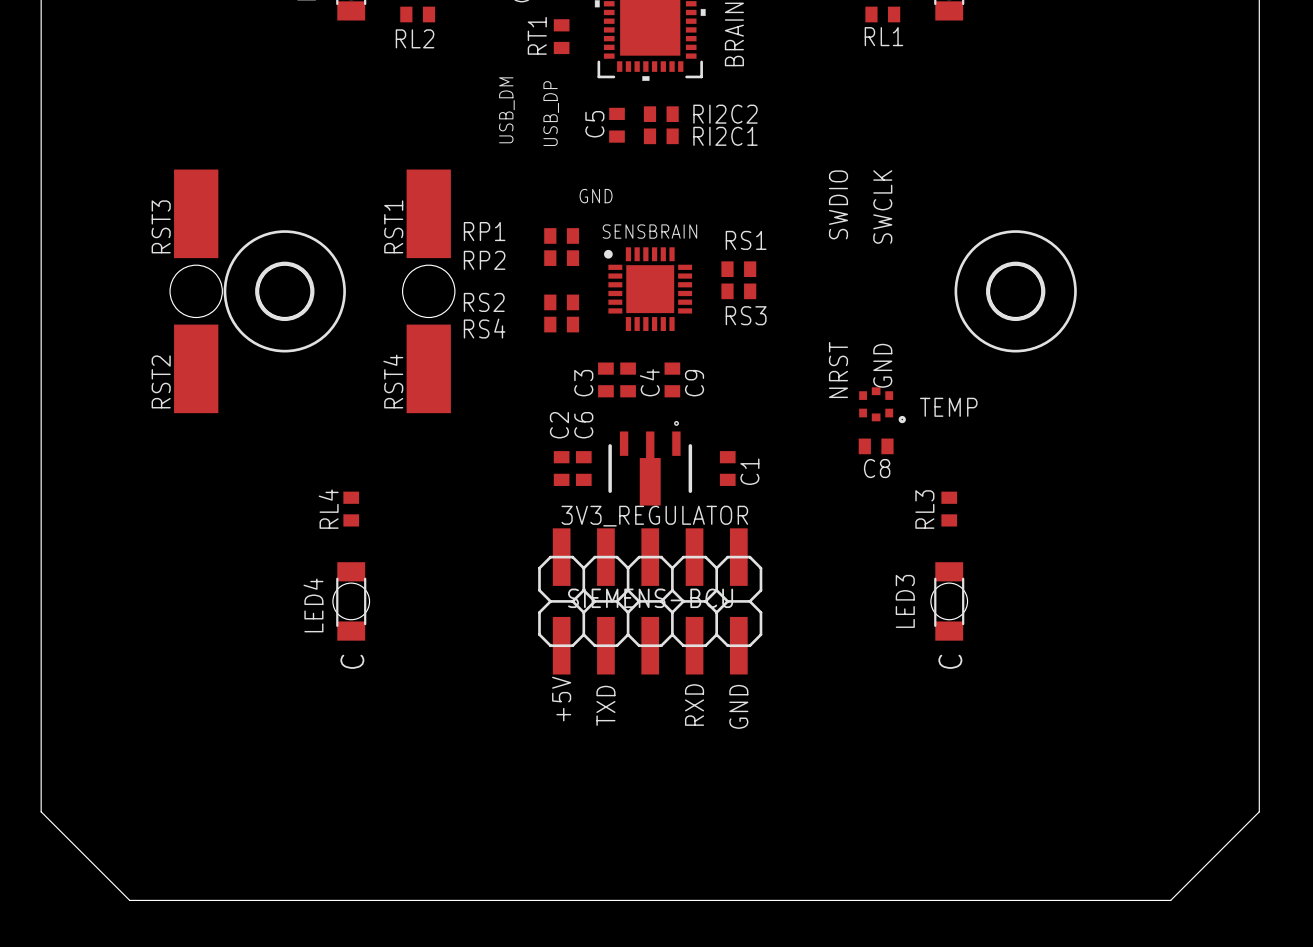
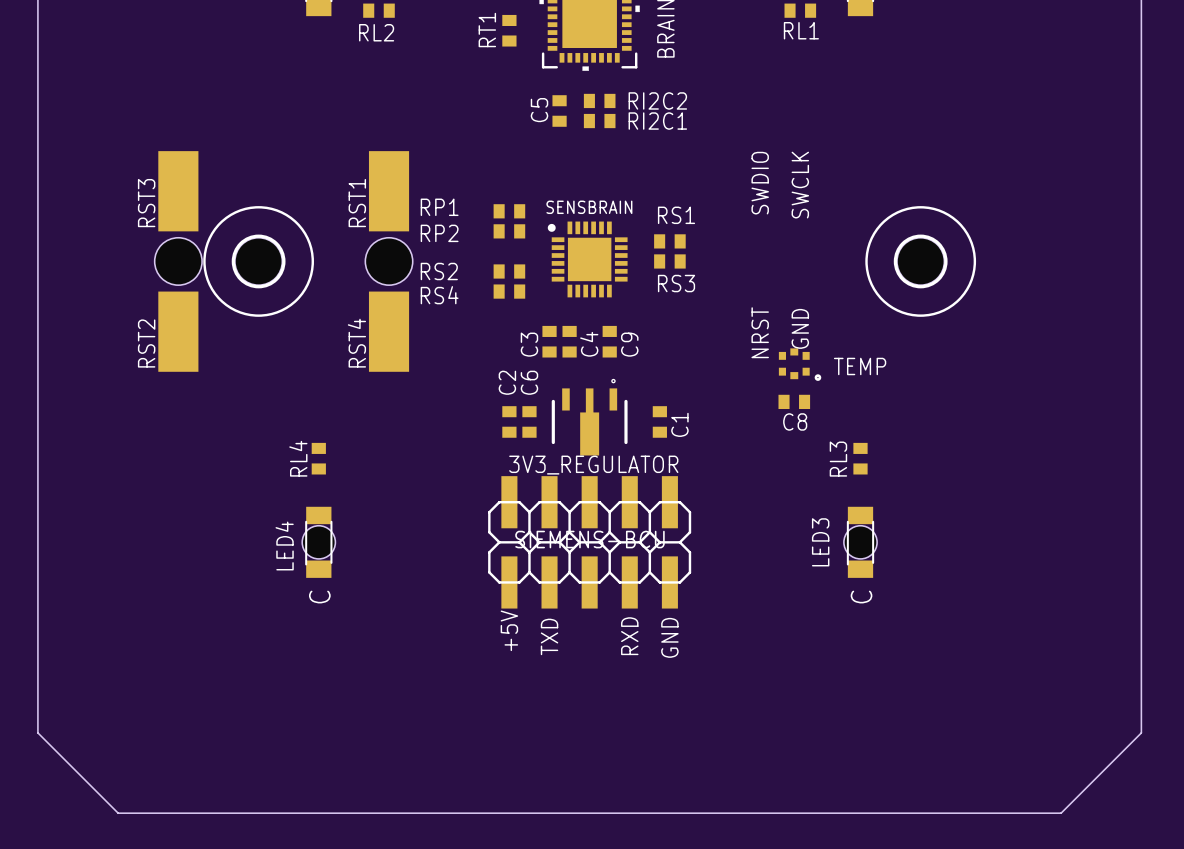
text: USB_DM (506, 110) -> none
text: USB_DP (551, 113) -> none
text: GND (596, 196) -> none

